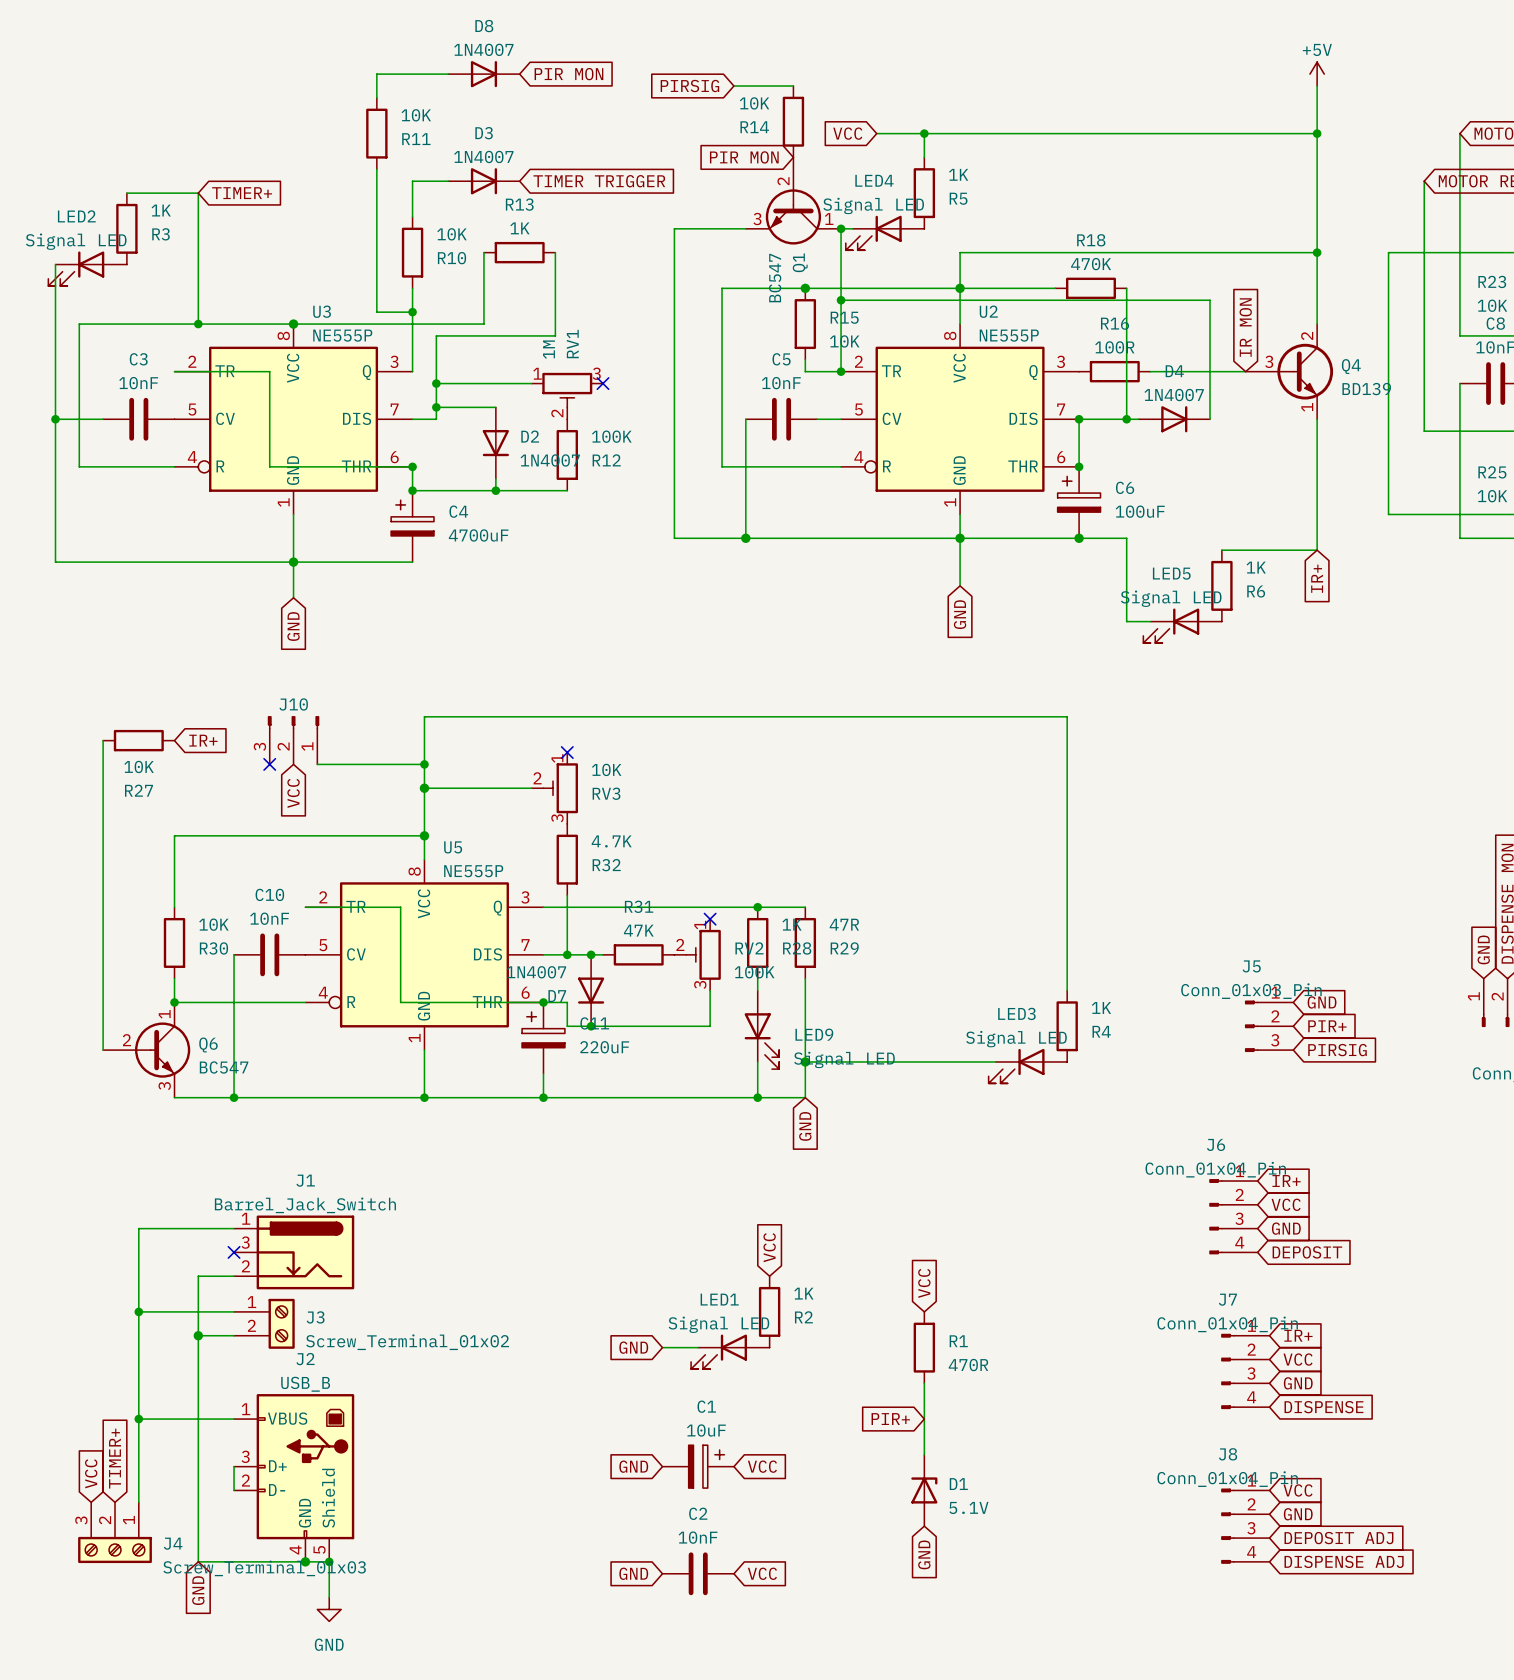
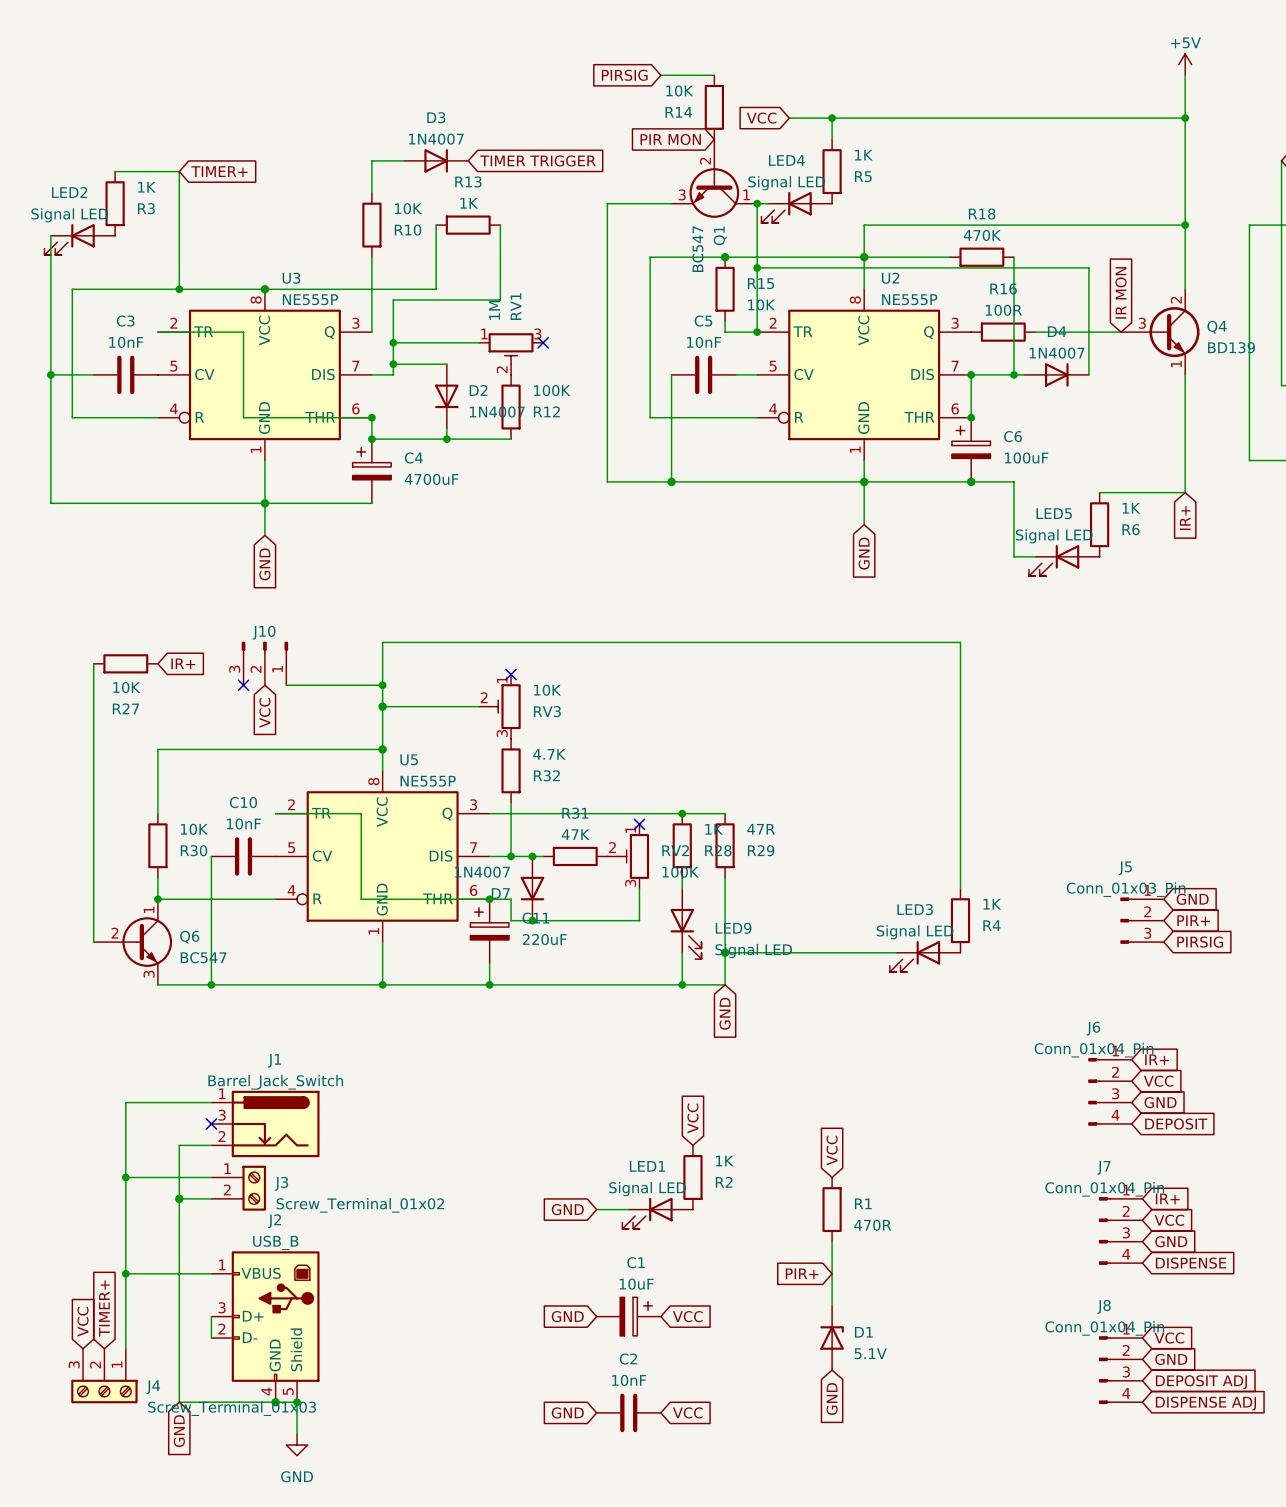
wire: (448, 74) (376, 74) (376, 97) -> none
D8: 1N4007 (483, 74) -> none
global label: PIR MON (568, 74) -> none
R11: 10K (376, 133) -> none
wire: (376, 169) (376, 312) (412, 312) -> none
junction: (412, 312) -> none

